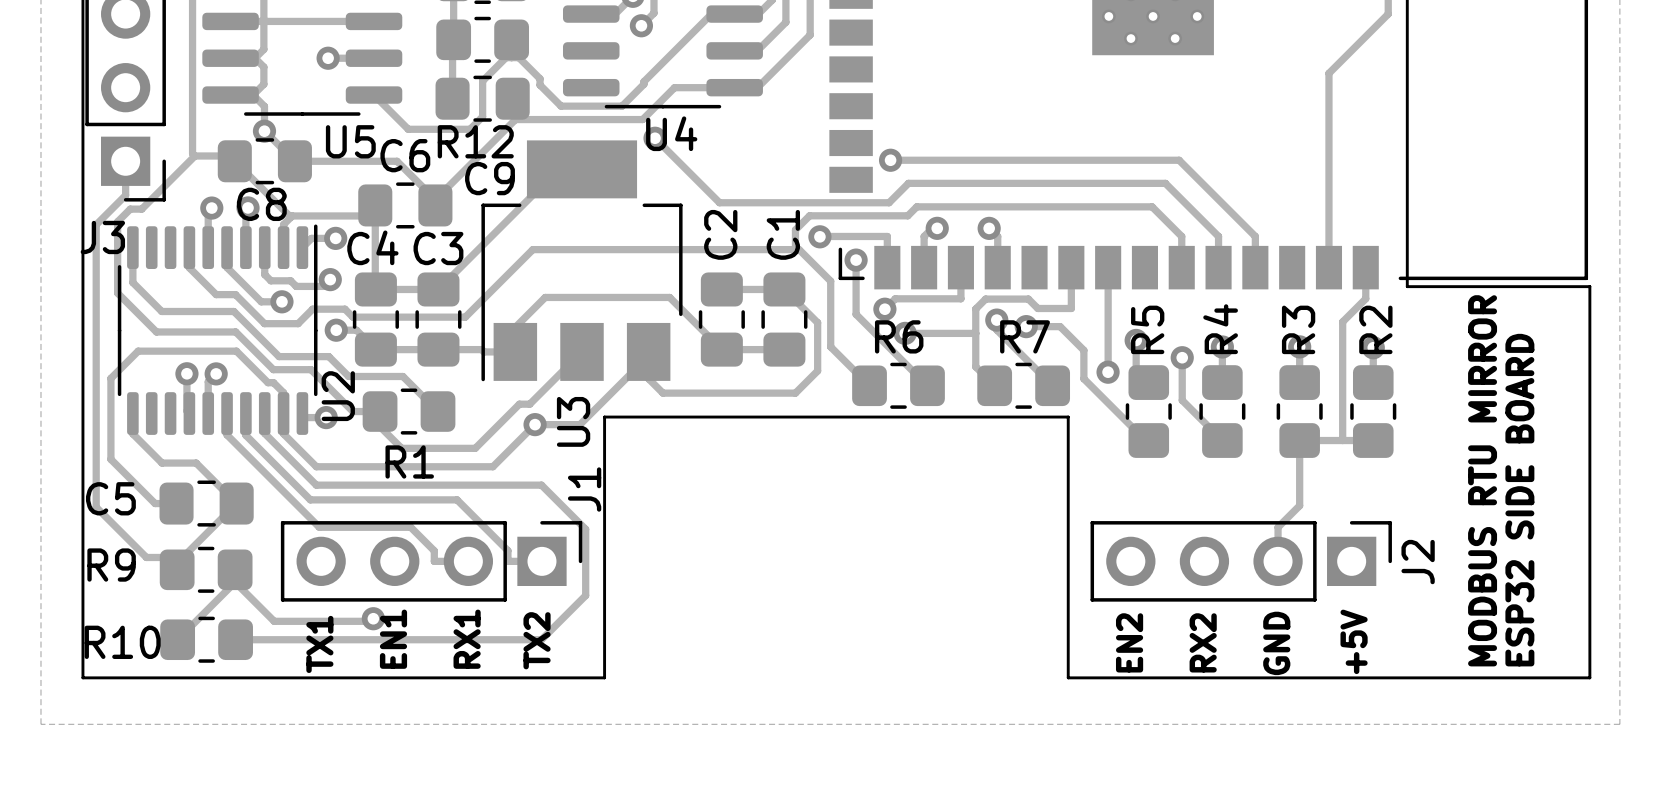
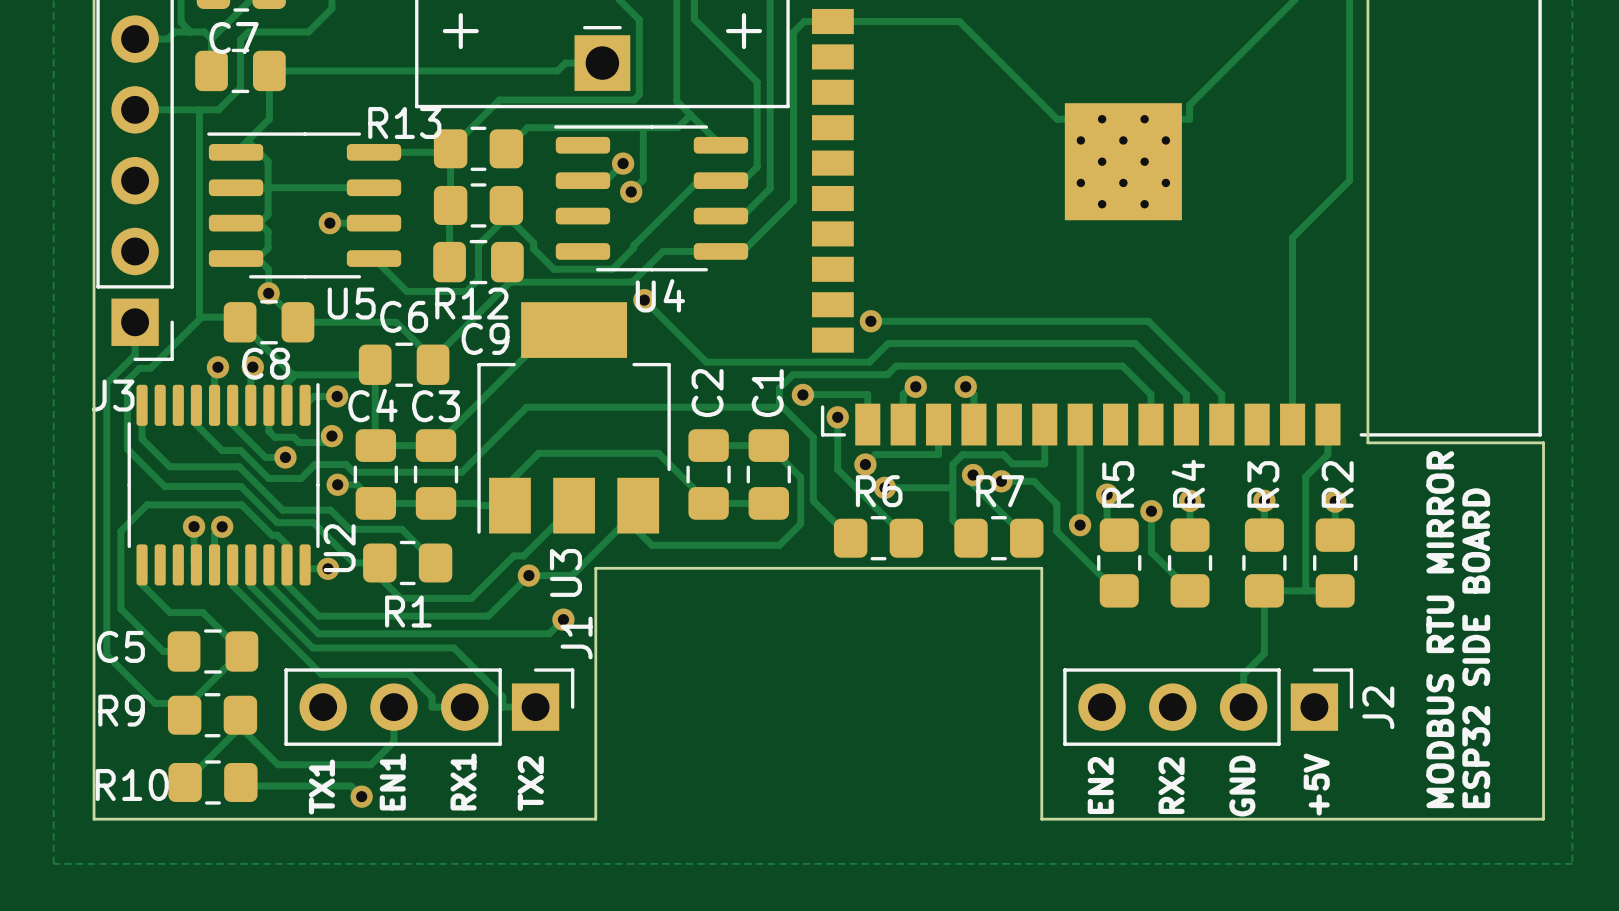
track: none -> (563, 619) (549, 633) (535, 633)
via: none -> (563, 619)
track: (541, 485) (585, 529) (585, 595) (541, 639) (235, 639) -> (361, 796) (351, 786) (244, 786) (240, 782)
track: none -> (393, 707) (393, 741) (373, 762)
via position: (373, 618) -> (361, 796)

